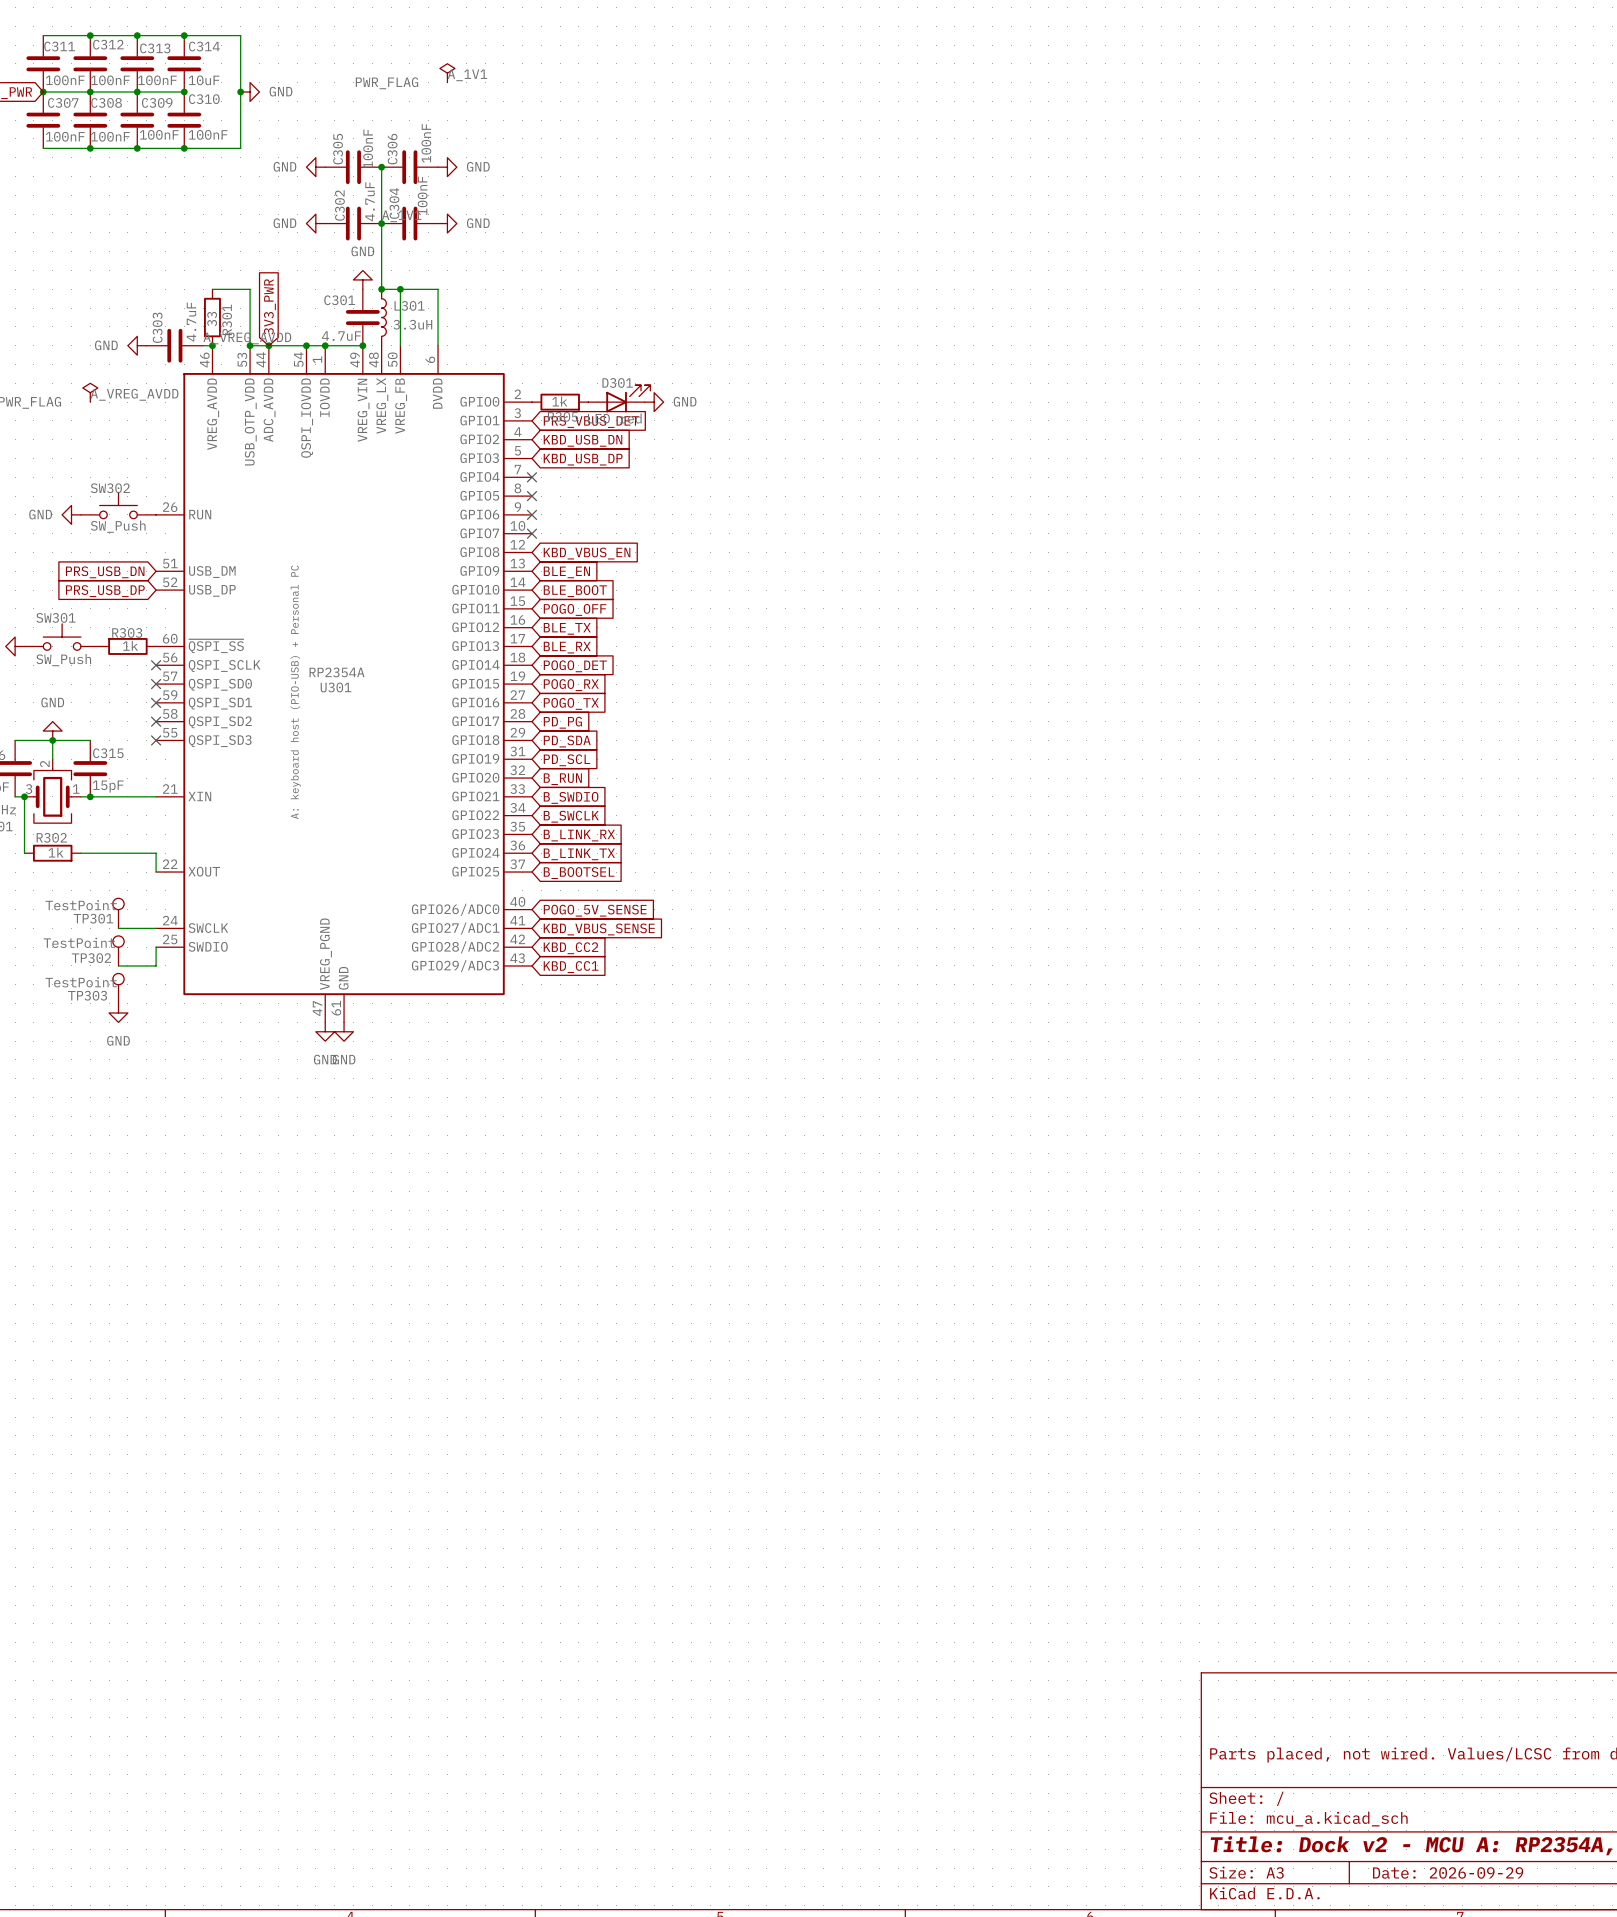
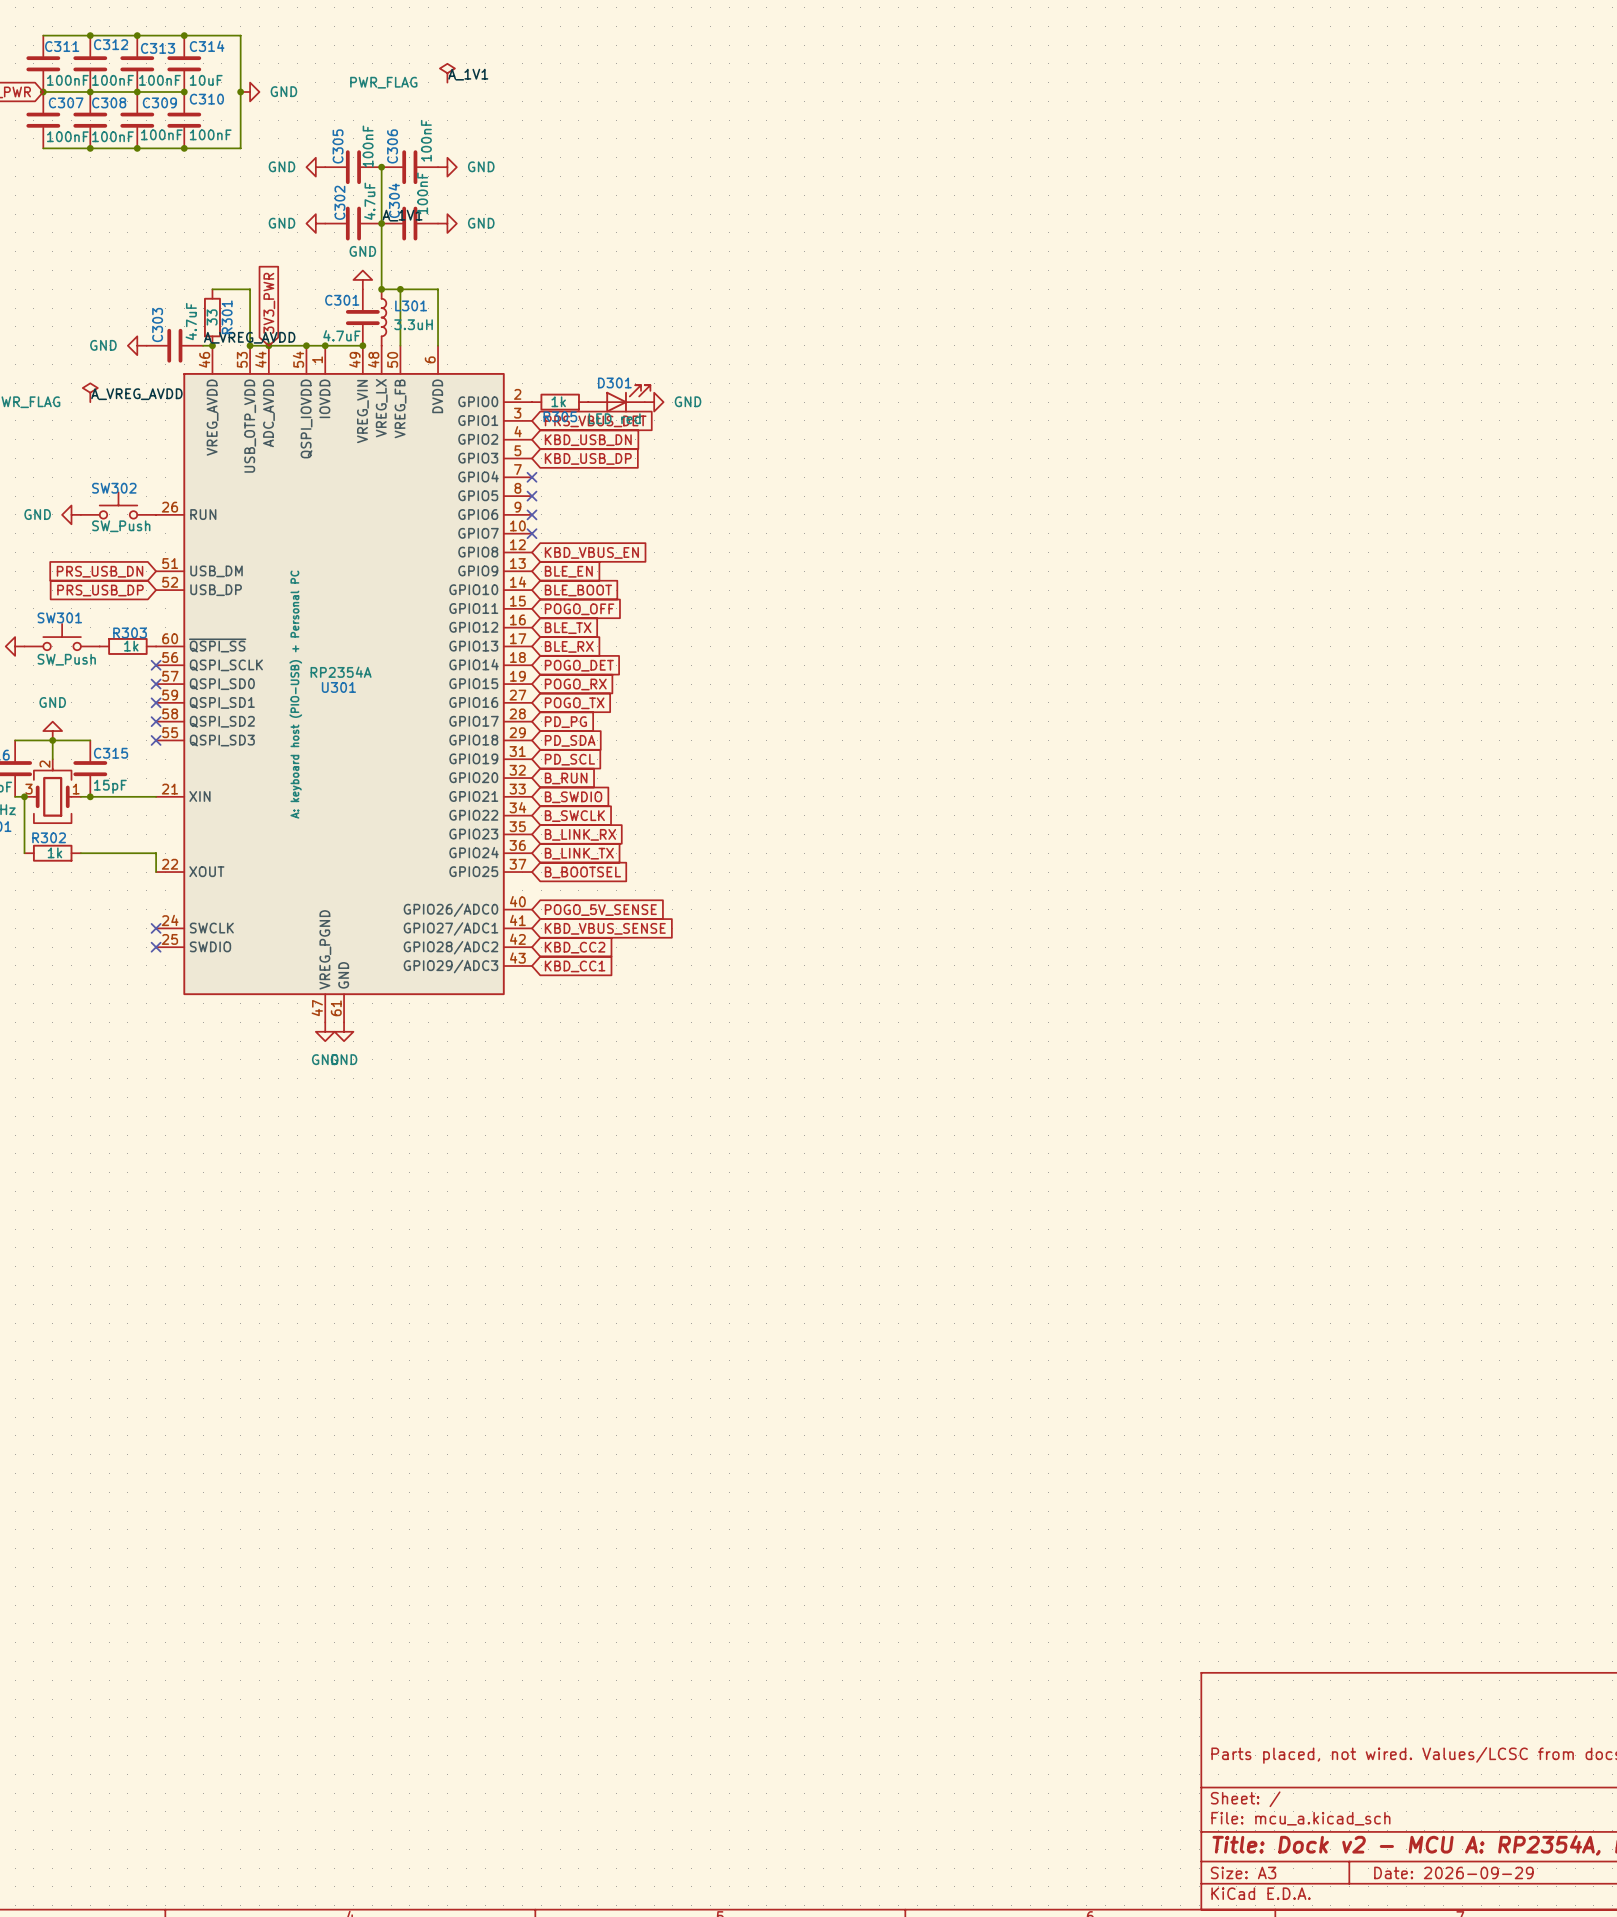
TP301: TestPoint (118, 913) -> none
wire: (118, 928) (156, 928) -> none
no-connect mark: none -> (156, 928)
wire: (156, 947) (156, 965) (118, 965) -> none
no-connect mark: none -> (156, 947)
TP302: TestPoint (118, 950) -> none
TP303: TestPoint (118, 988) -> none
power symbol: GND (118, 1012) -> none

